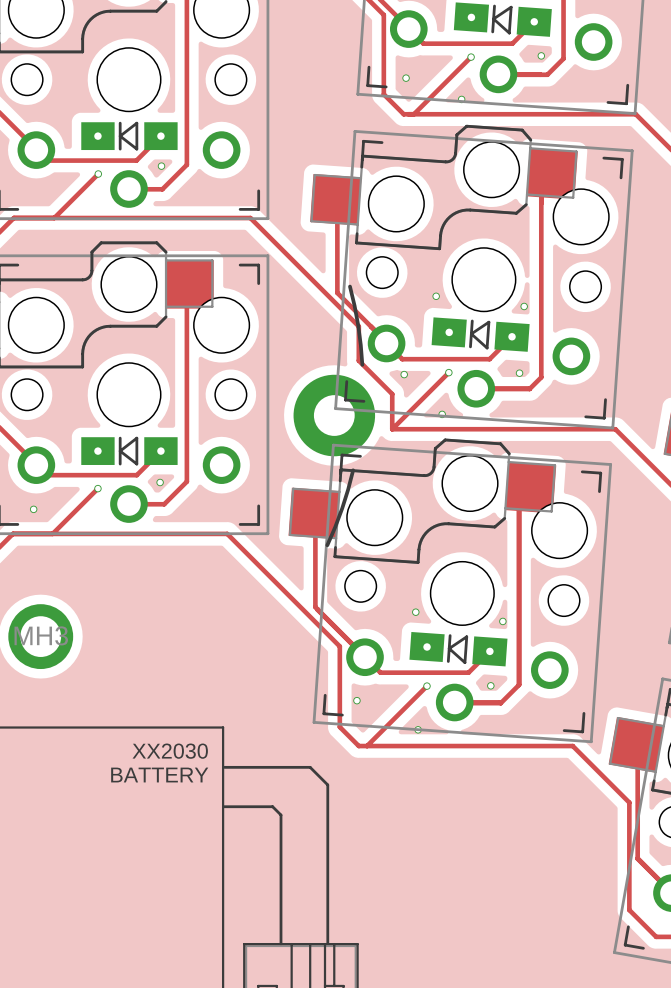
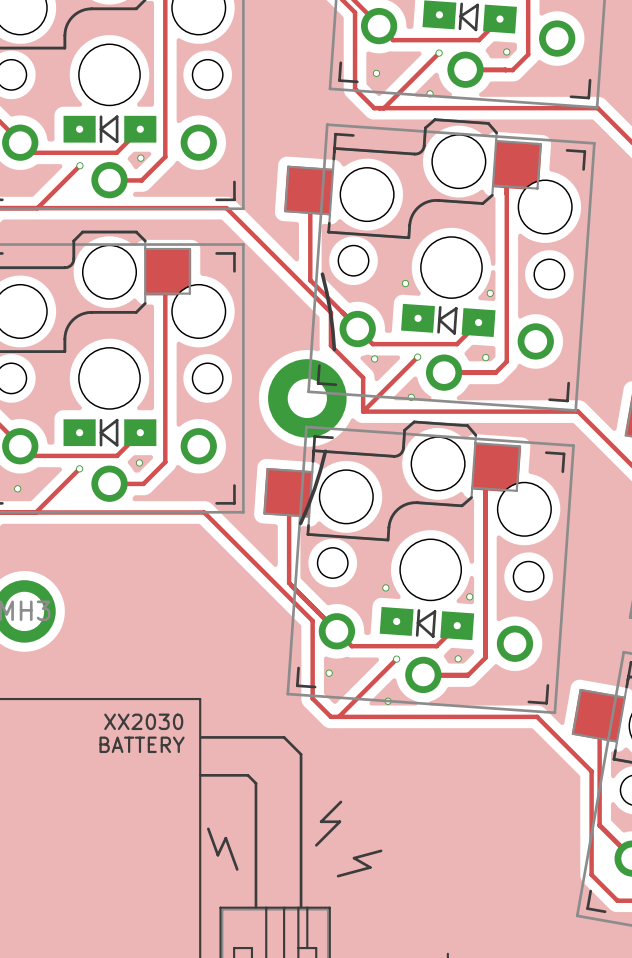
line: none -> (340, 801) (321, 821) (339, 821) (316, 845)
line: none -> (208, 828) (217, 855) (225, 838) (237, 869)
line: none -> (381, 850) (354, 858) (370, 867) (338, 876)

